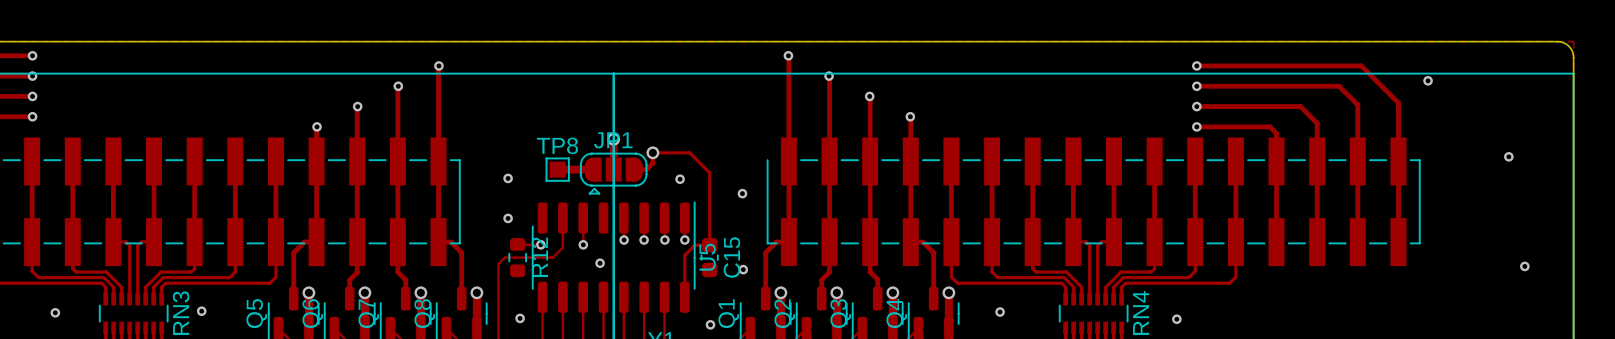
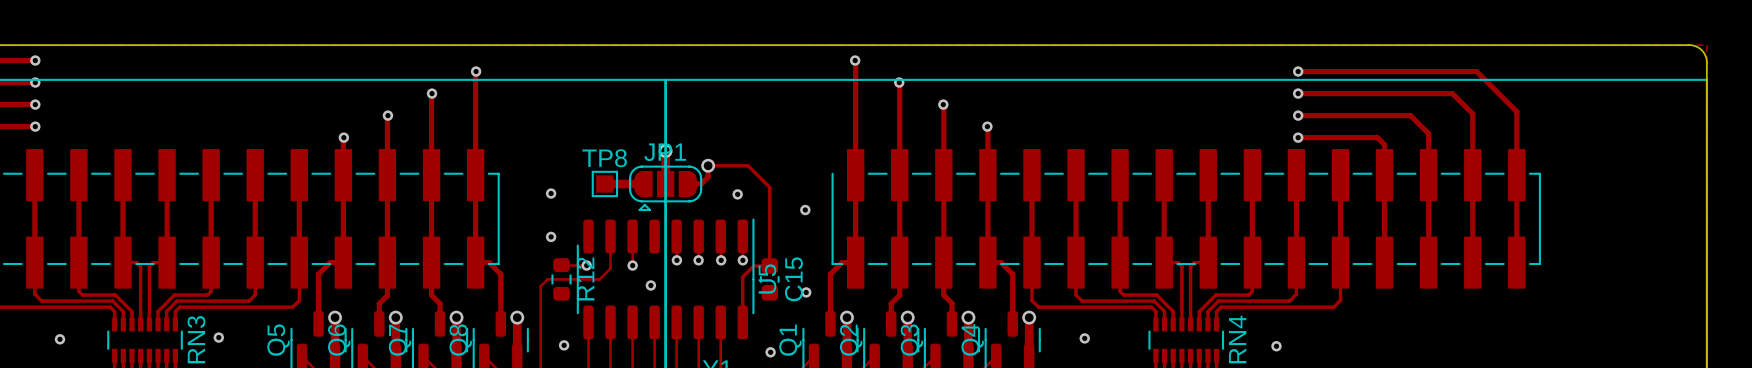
via: (1428, 80) -> none
via: (1508, 156) -> none
via: (1524, 266) -> none

